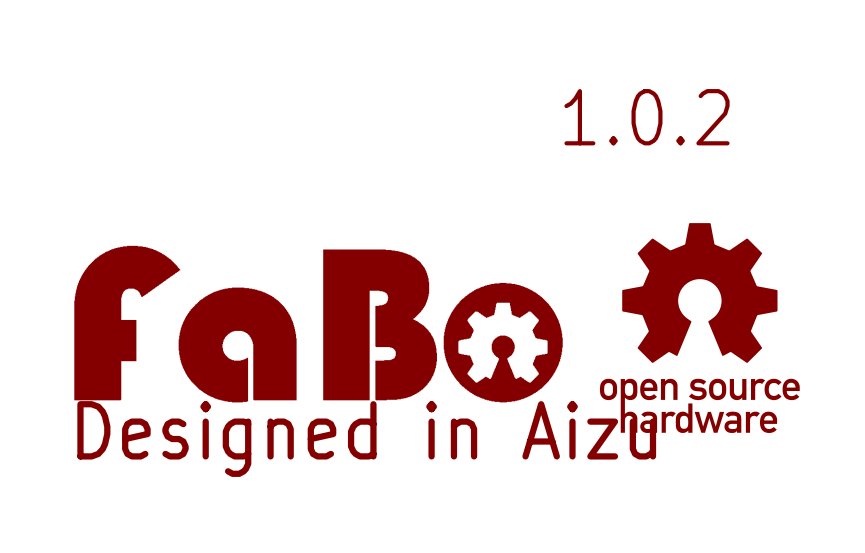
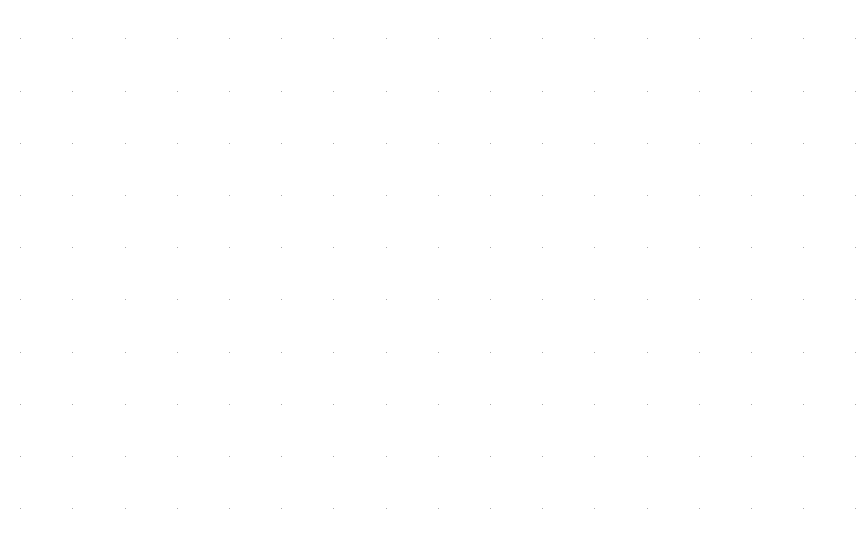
text: 1.0.2 (647, 117) -> none
part: (318, 324) -> none
part: (699, 328) -> none

